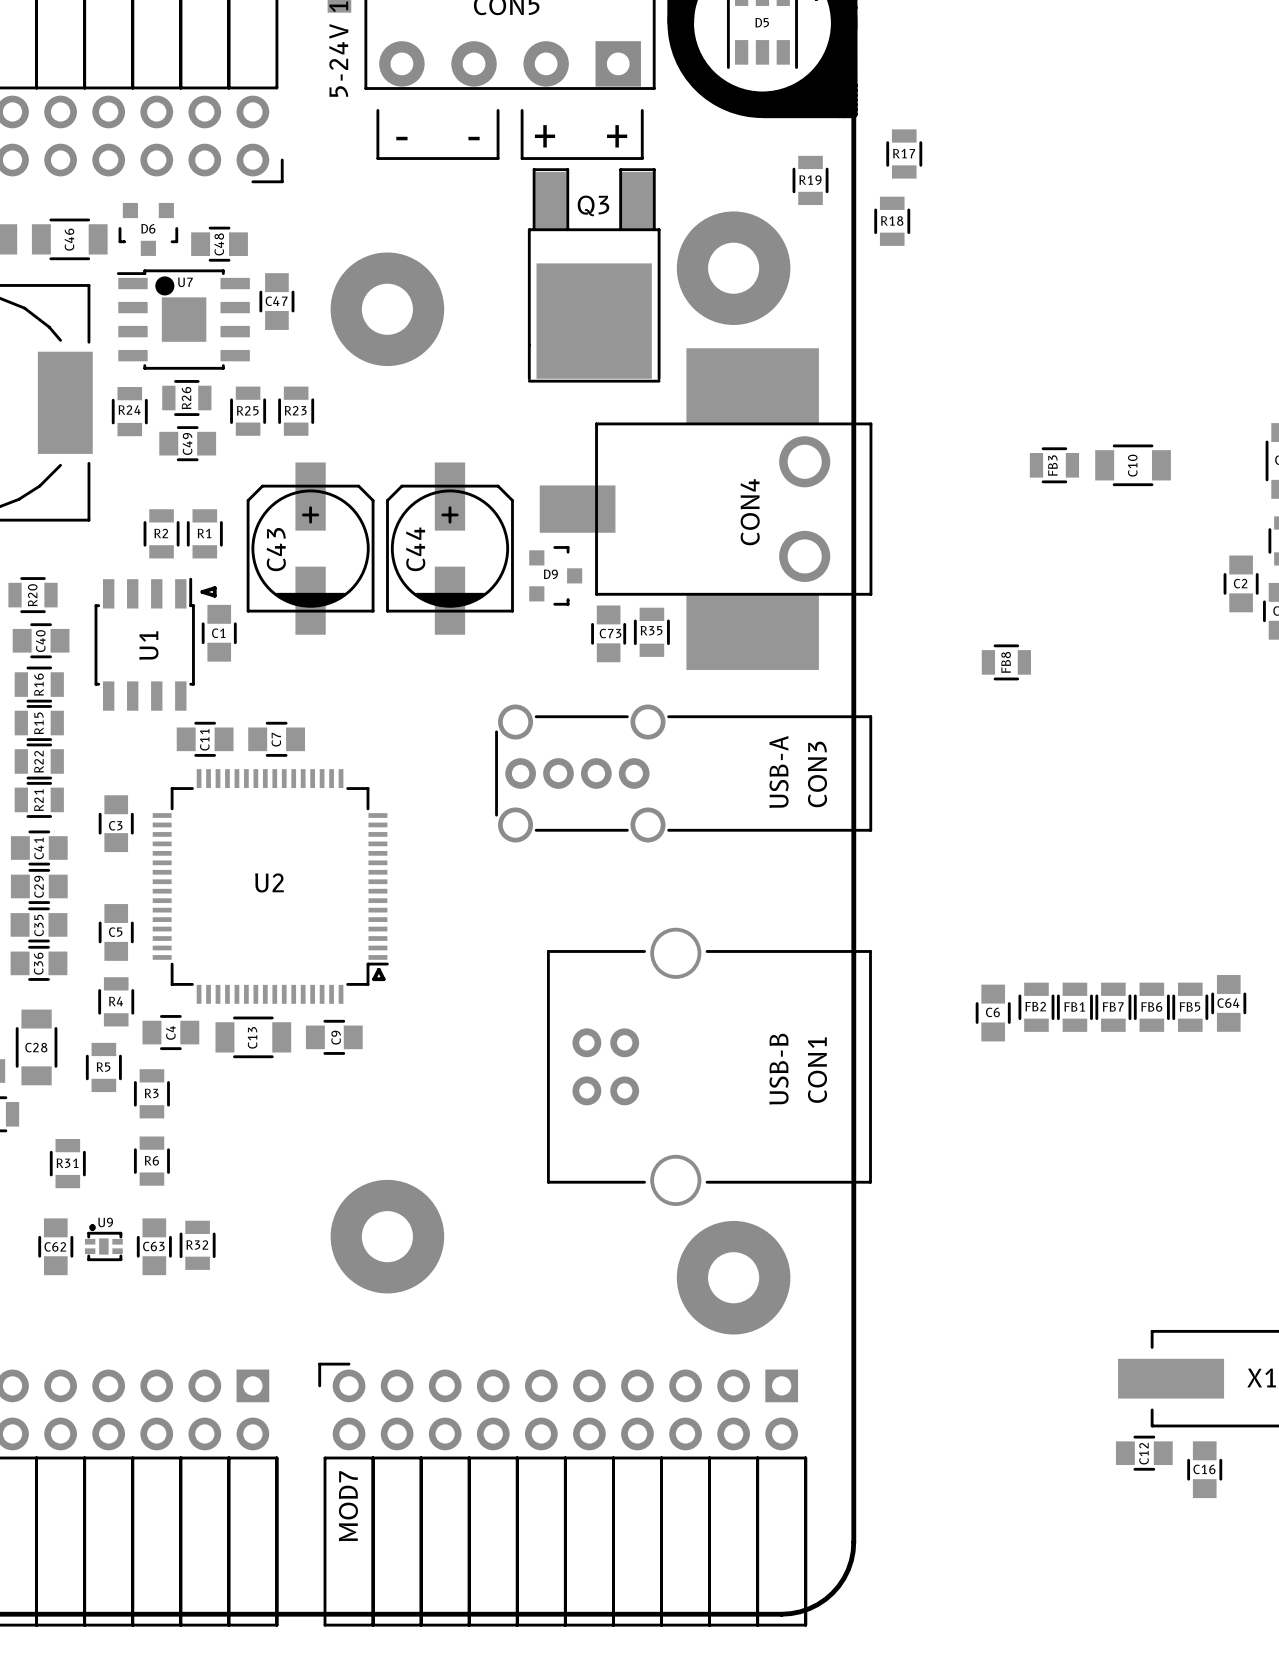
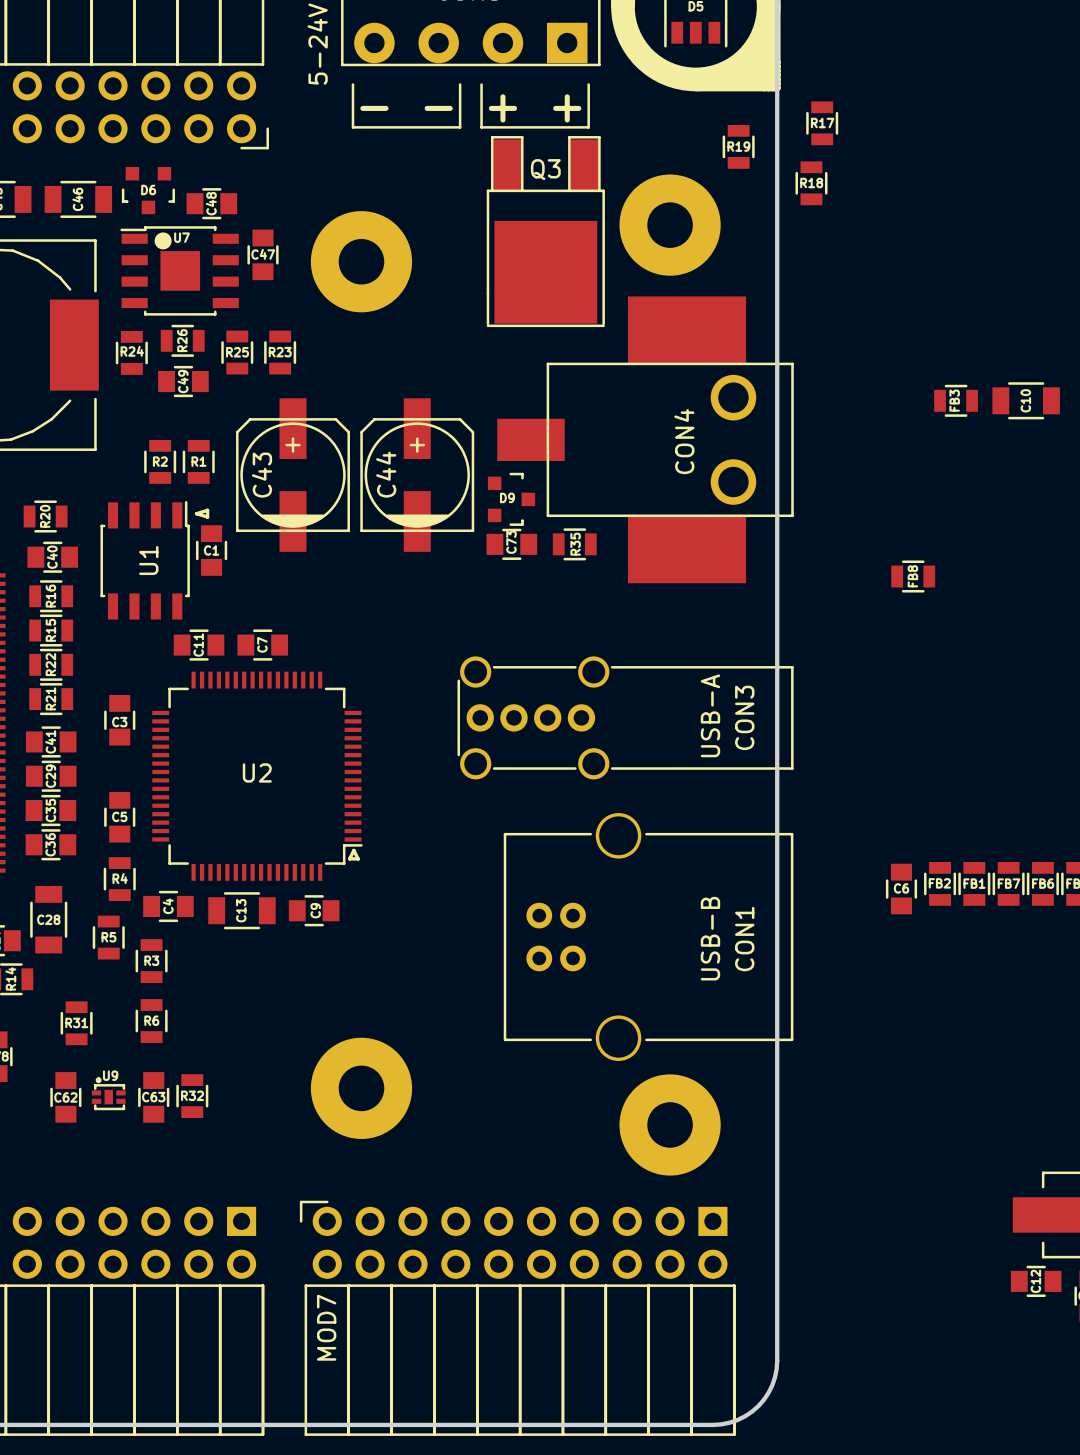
R35 rotation: 0° (651, 632) -> 90° clockwise (574, 544)
C73 rotation: 0° (608, 633) -> 90° clockwise (511, 544)
C73 position: (608, 633) -> (511, 544)
CON3 position: (683, 773) -> (625, 717)

